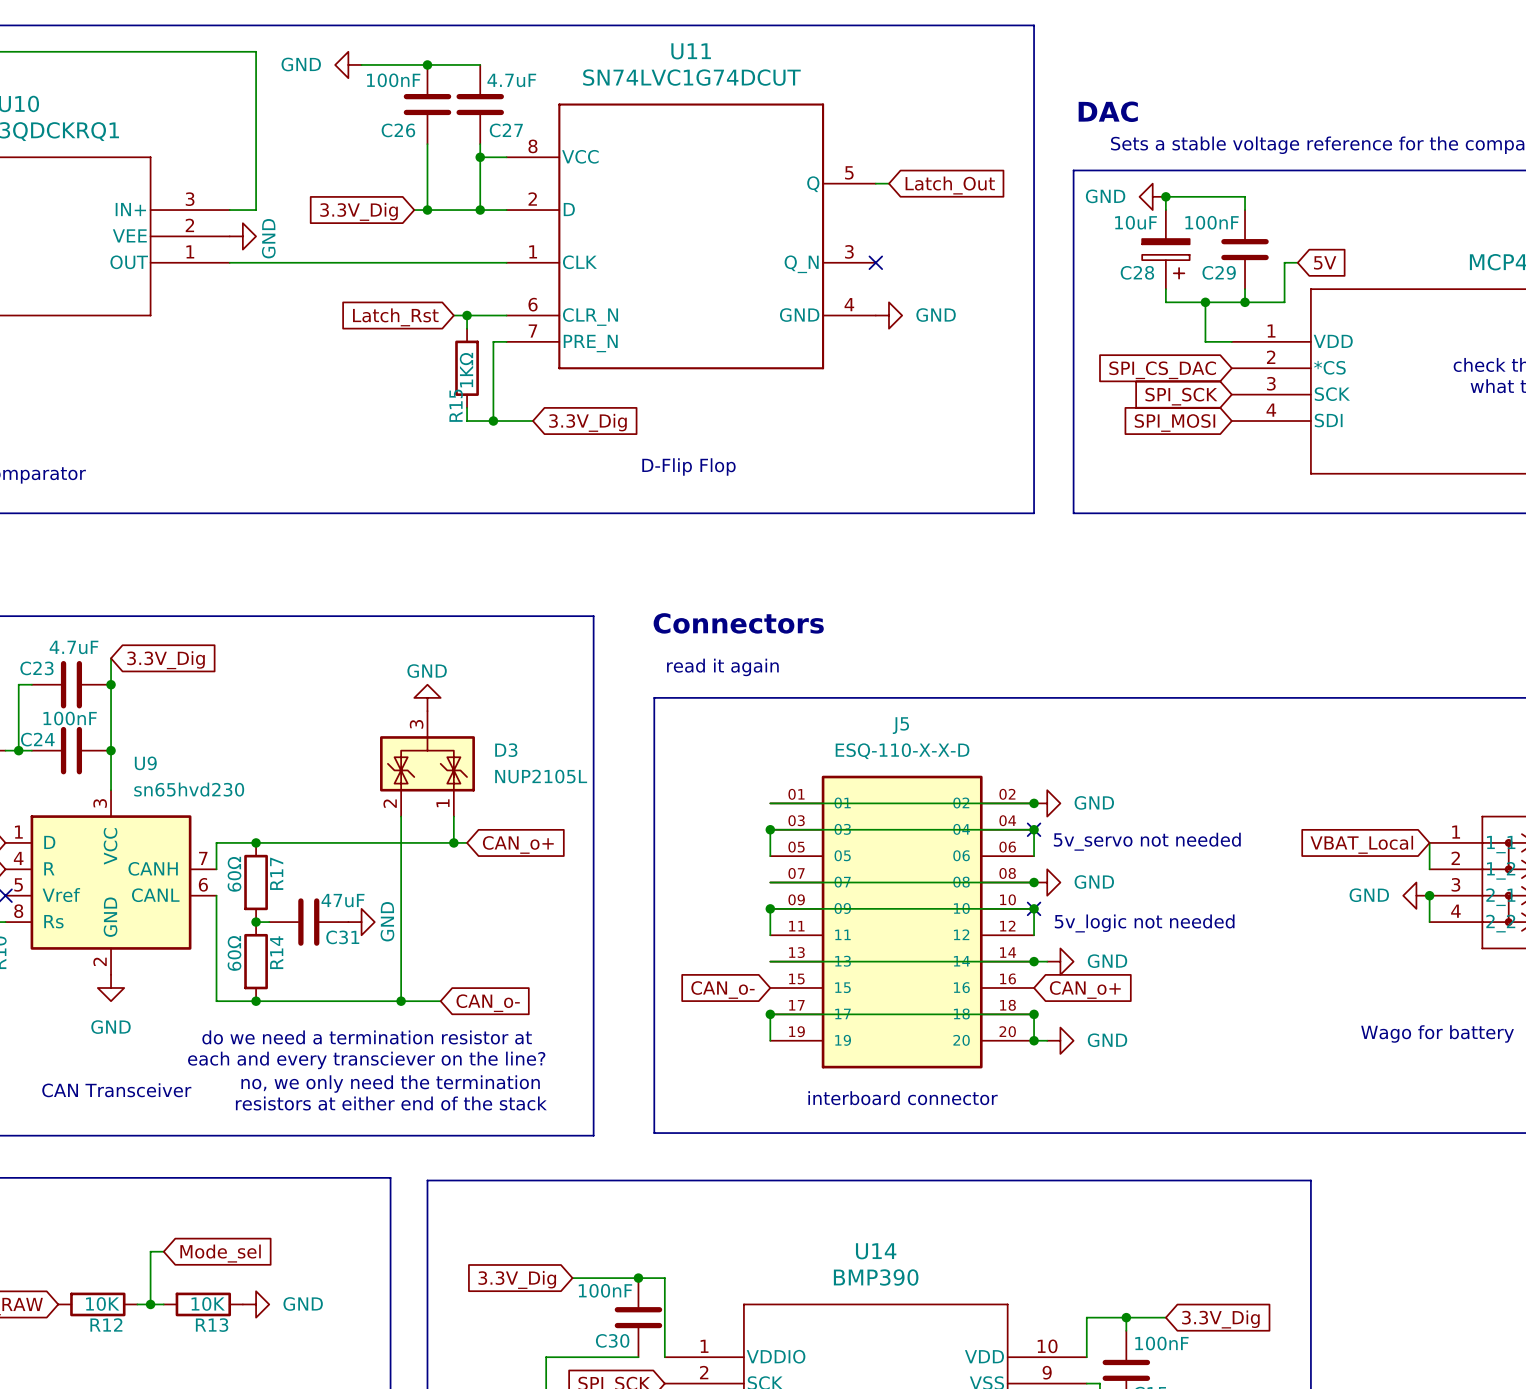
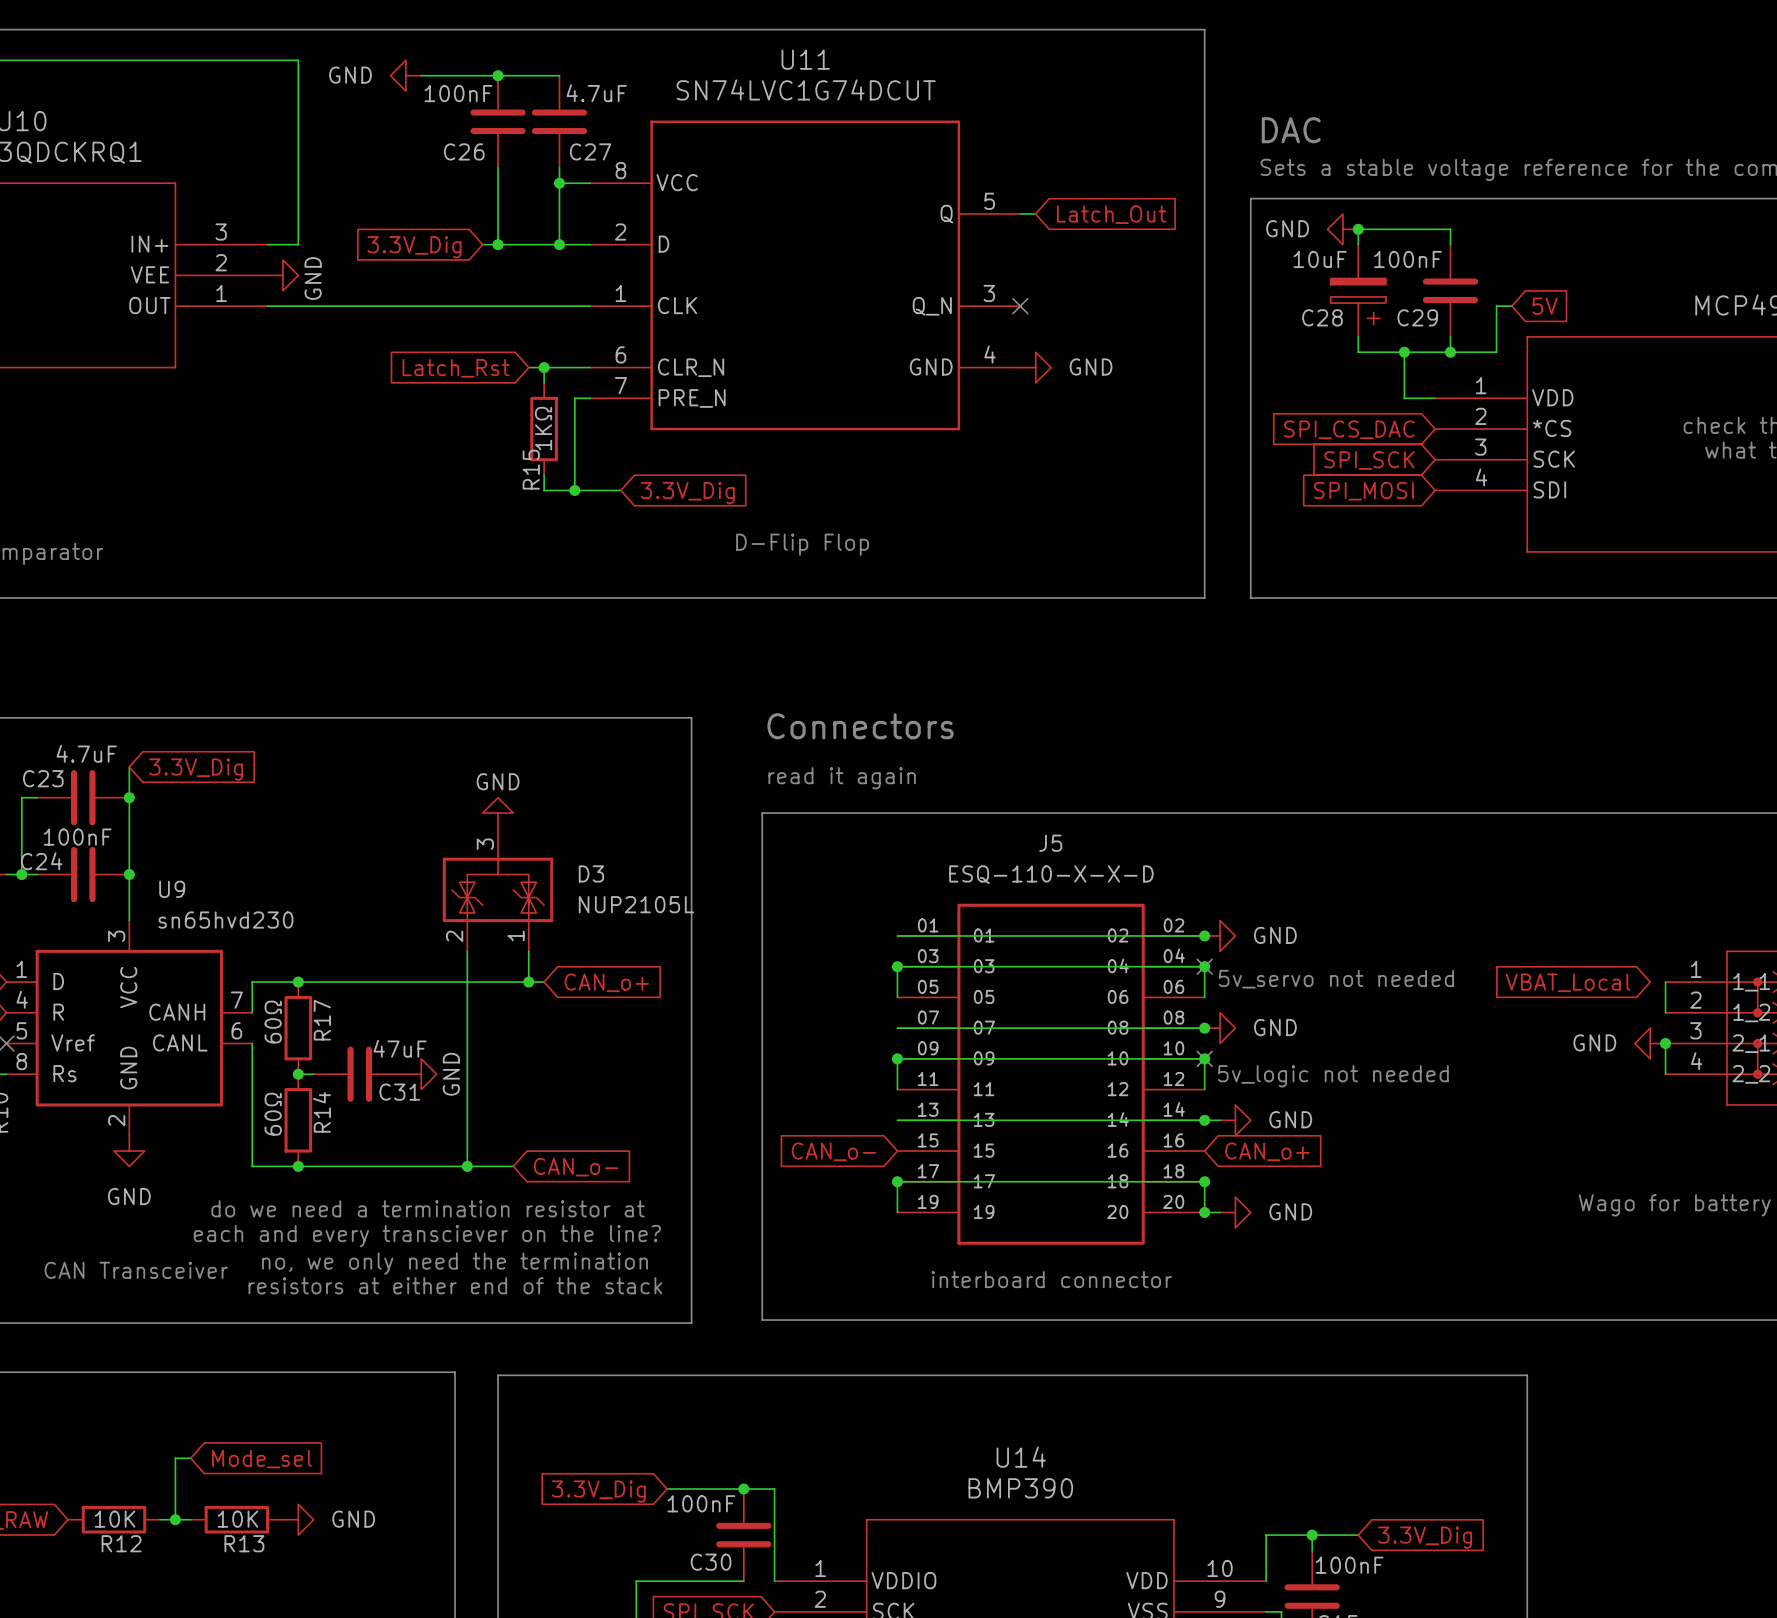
global label position: VBAT_Local (1361, 844) -> VBAT_Local (1568, 982)

